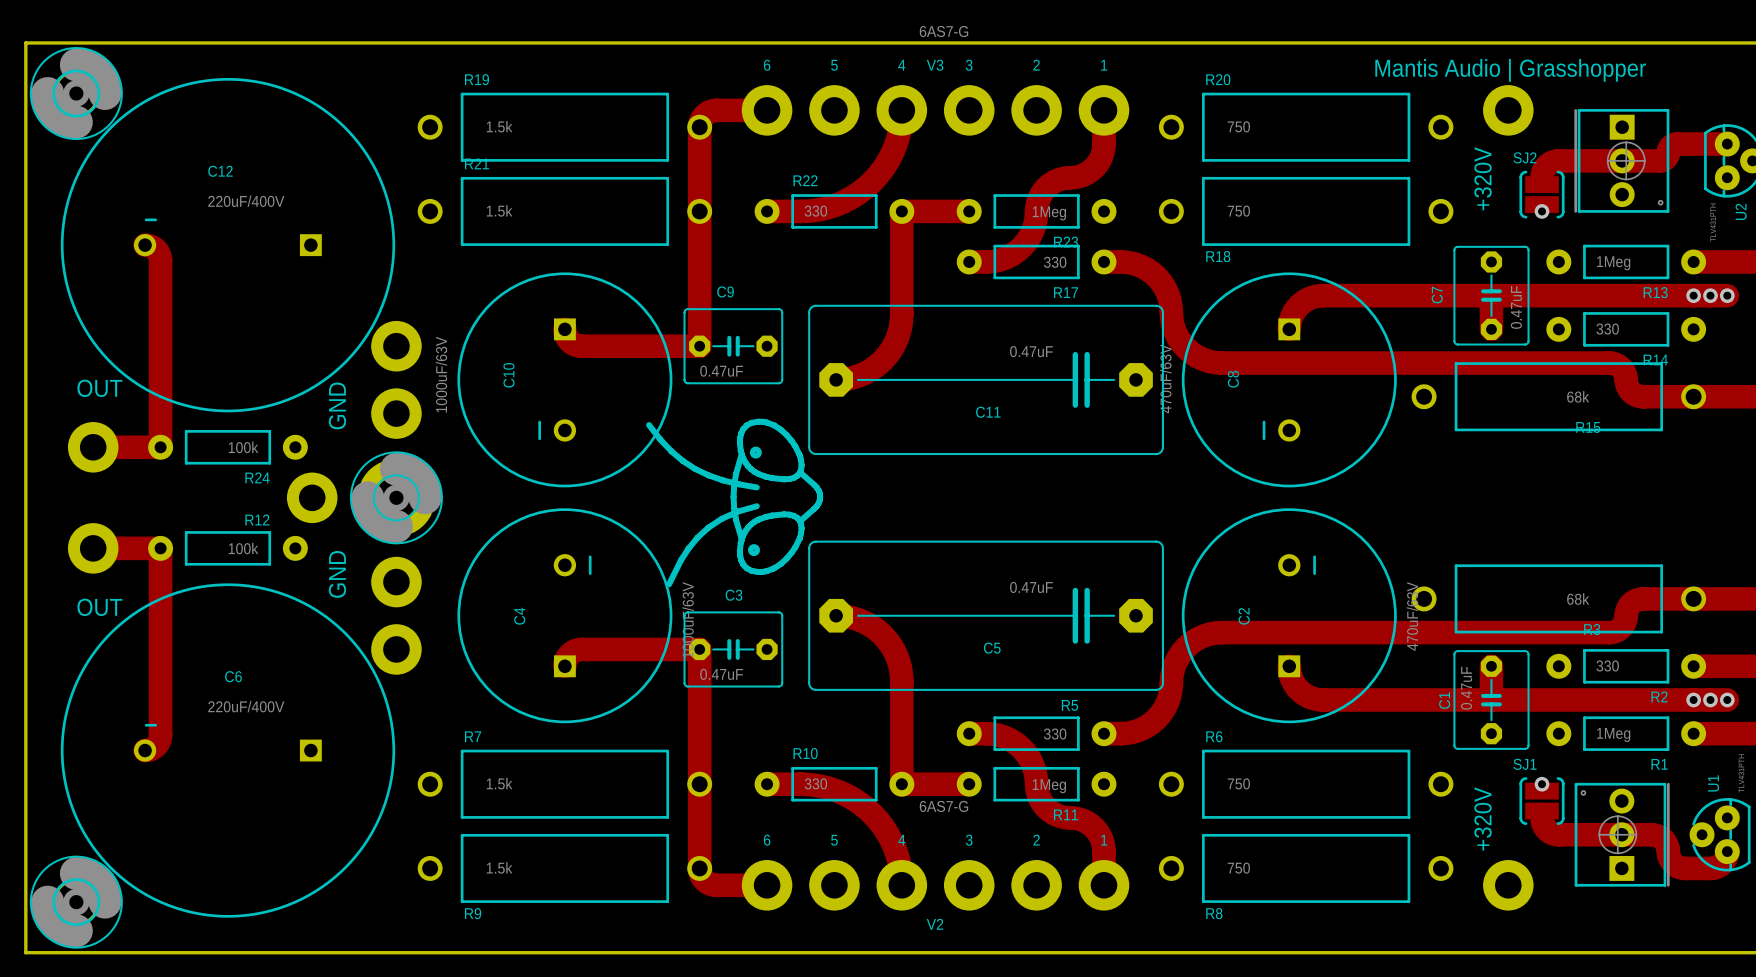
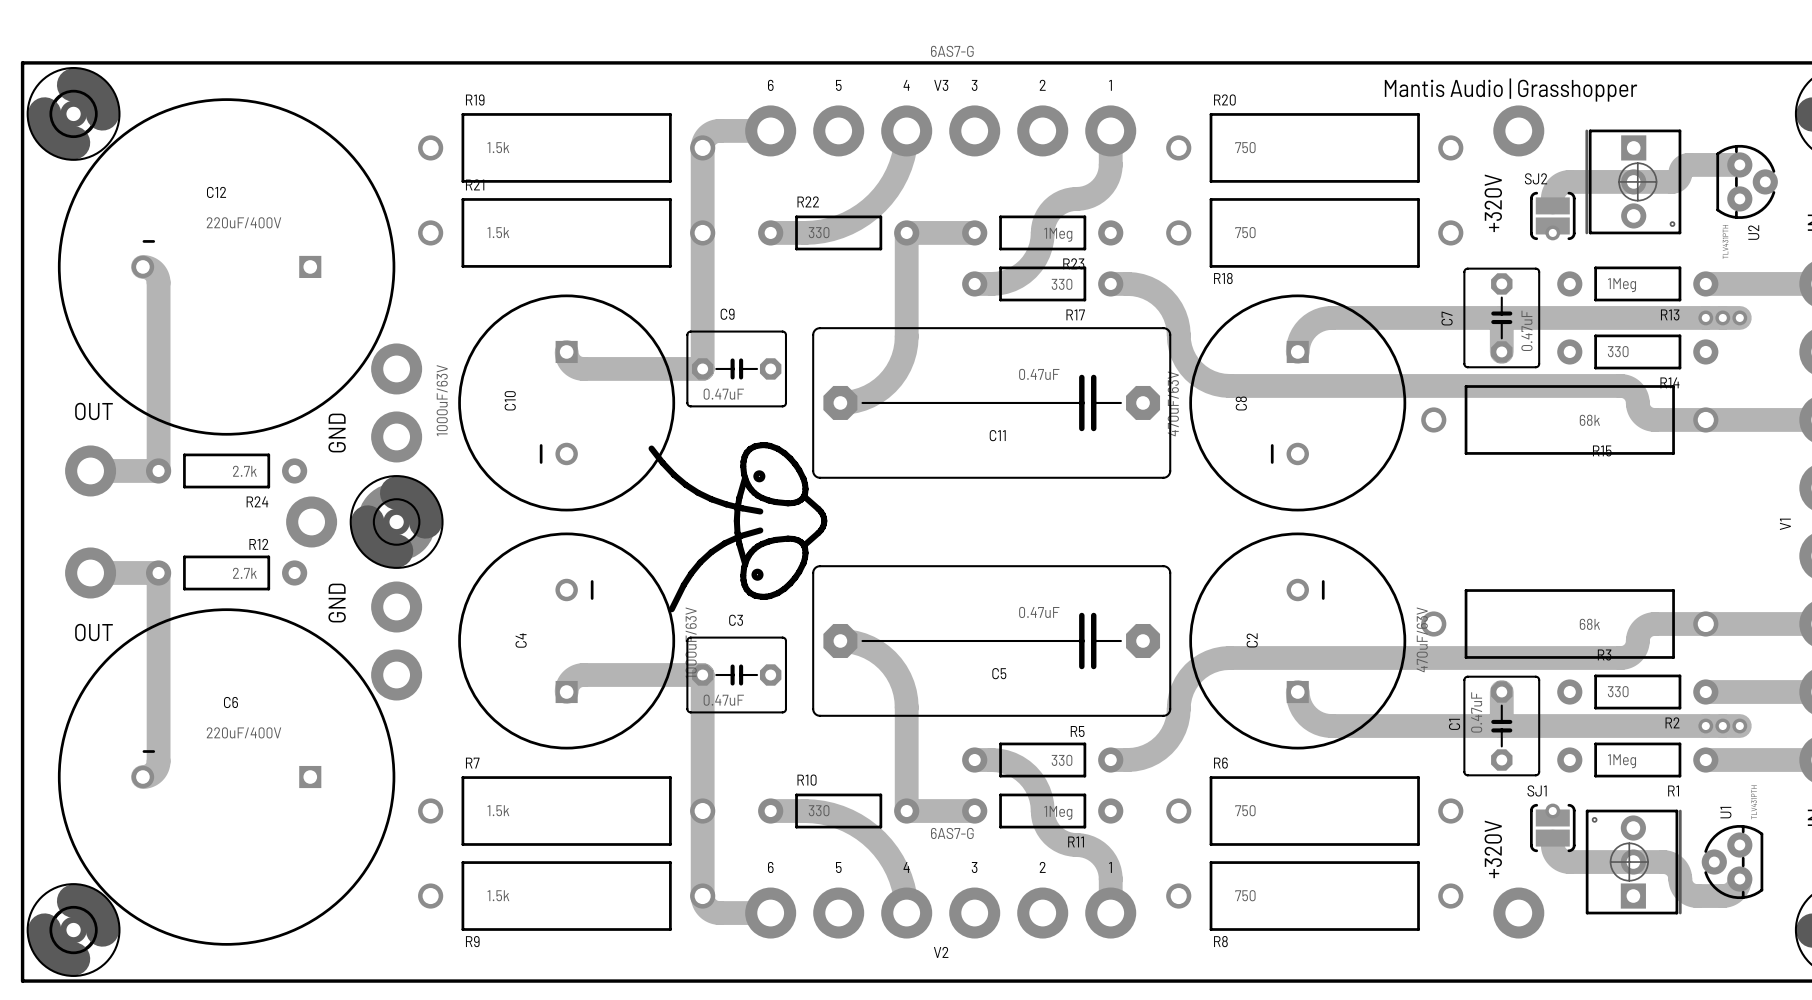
R24 value: 100k (243, 447) -> 2.7k (244, 471)
R12 value: 100k (243, 548) -> 2.7k (244, 573)

